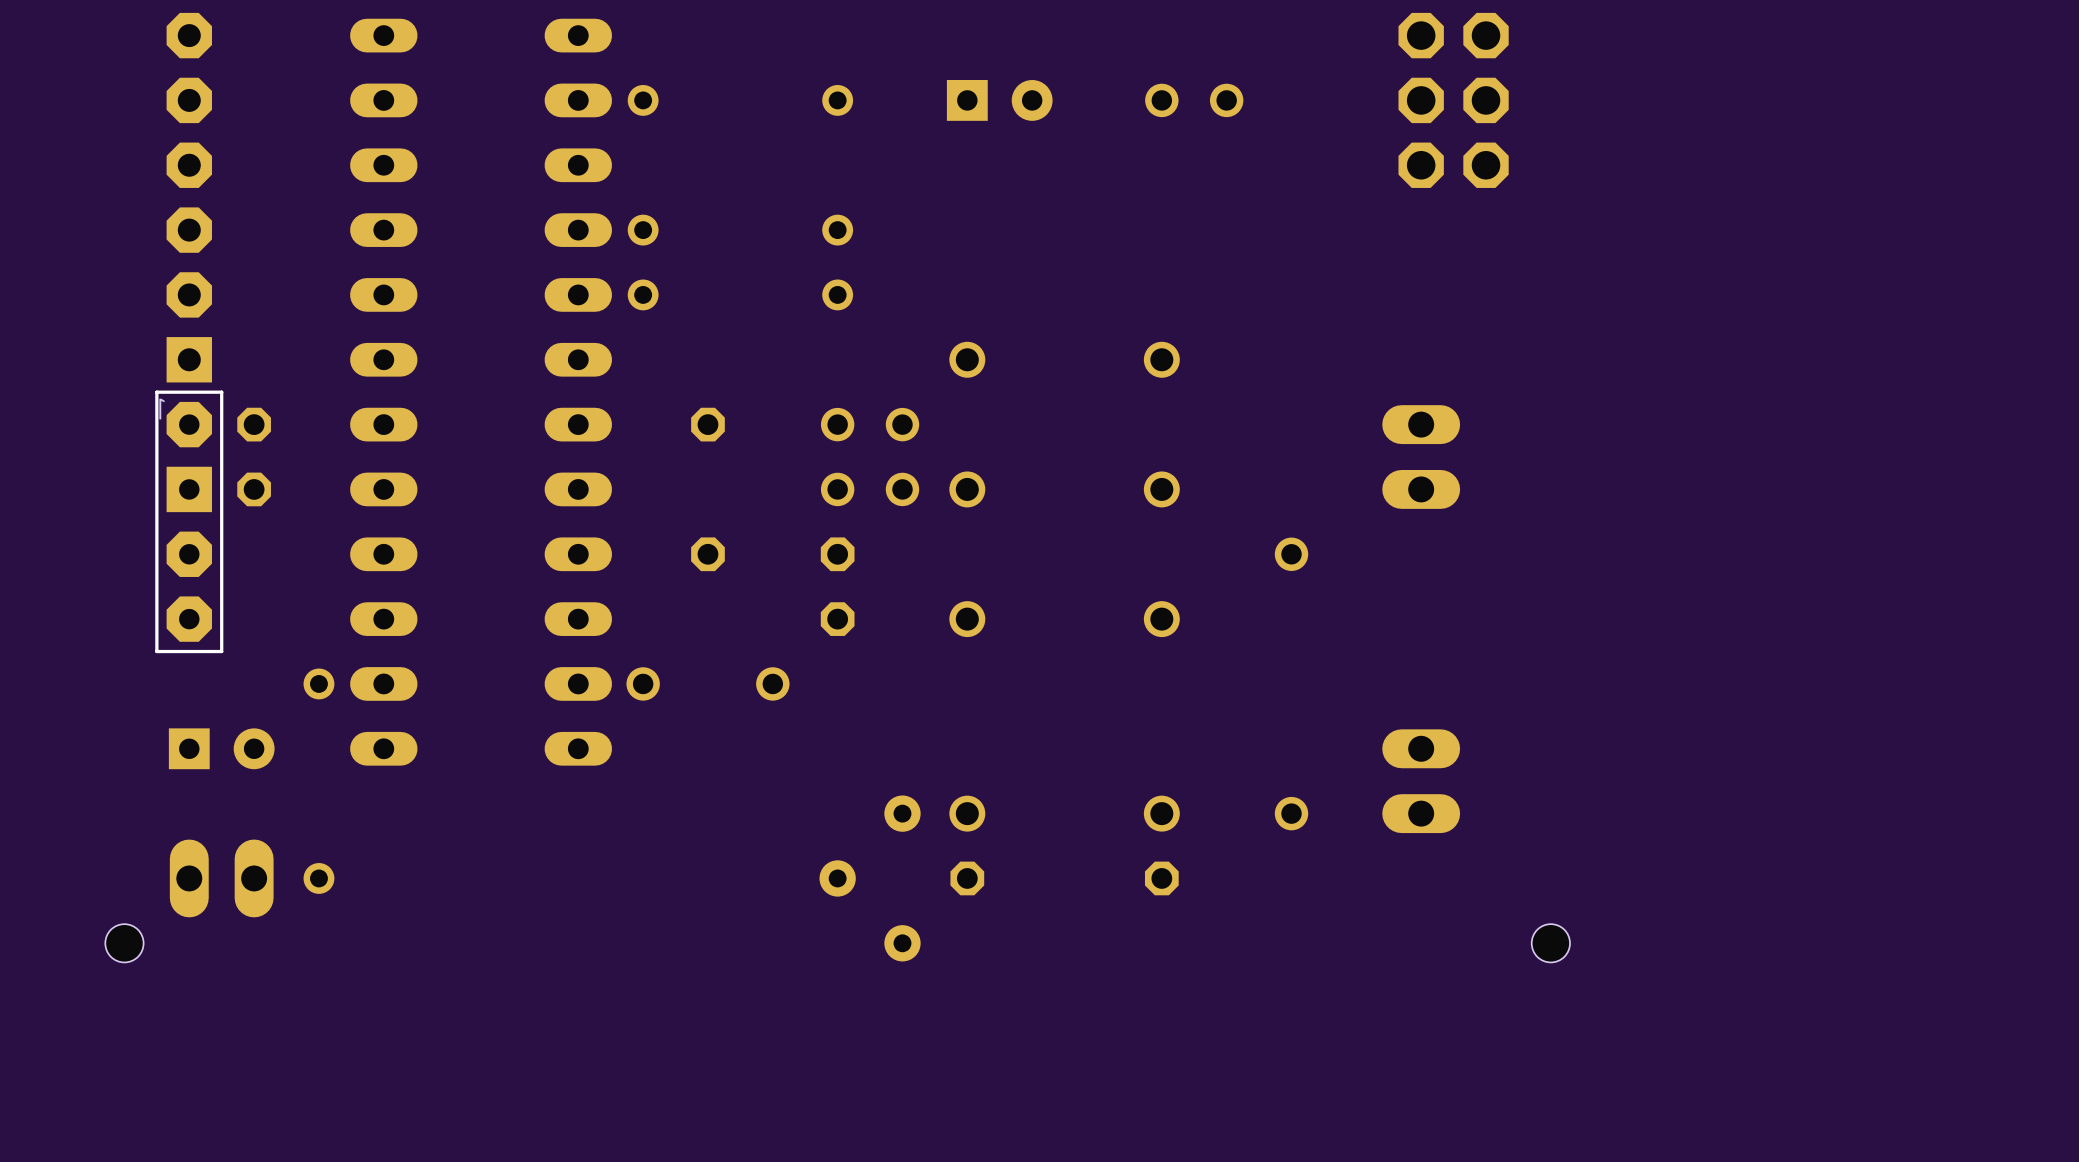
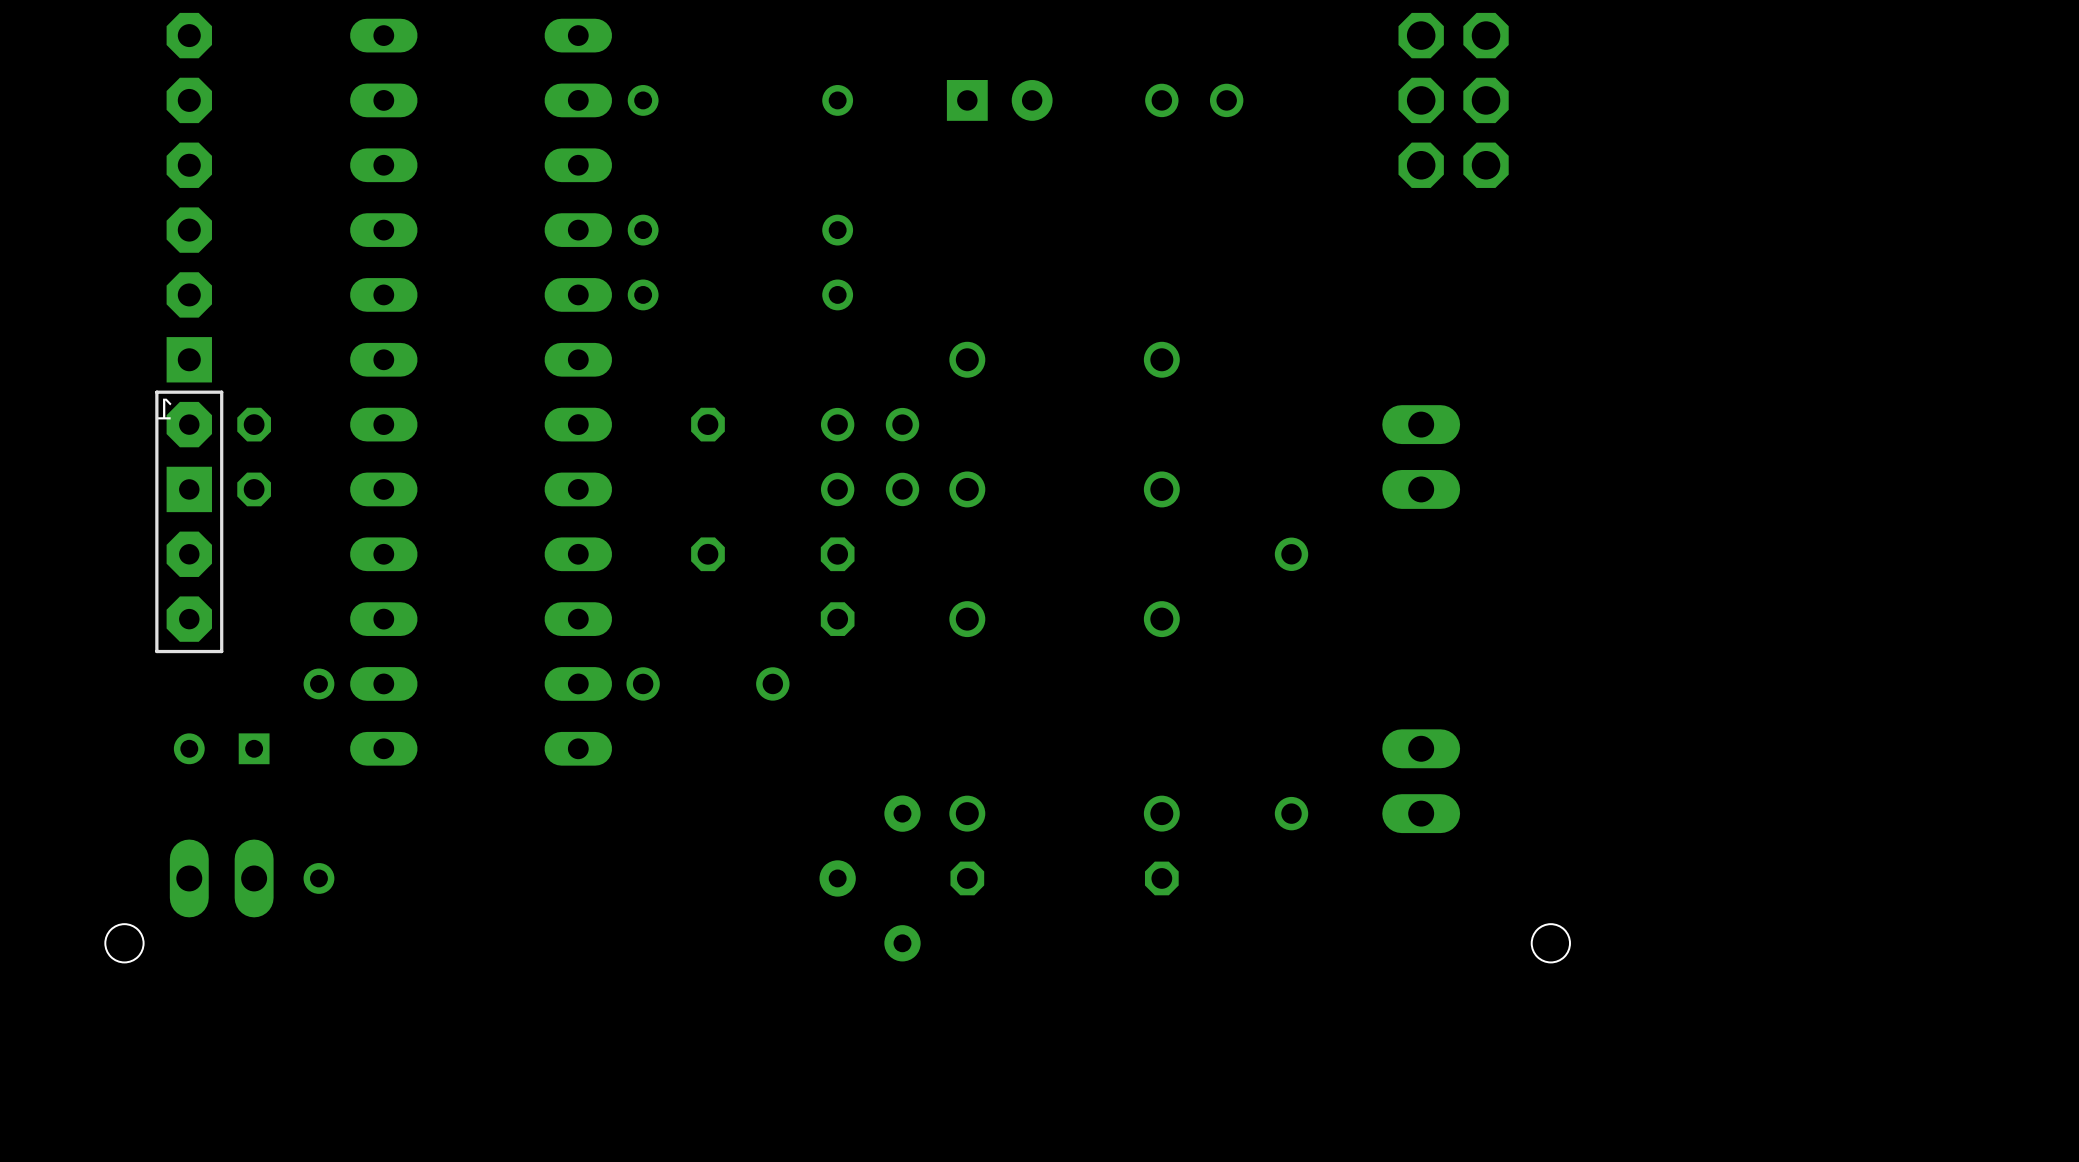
part footprint: [168, 728, 275, 770] -> [173, 733, 270, 765]

